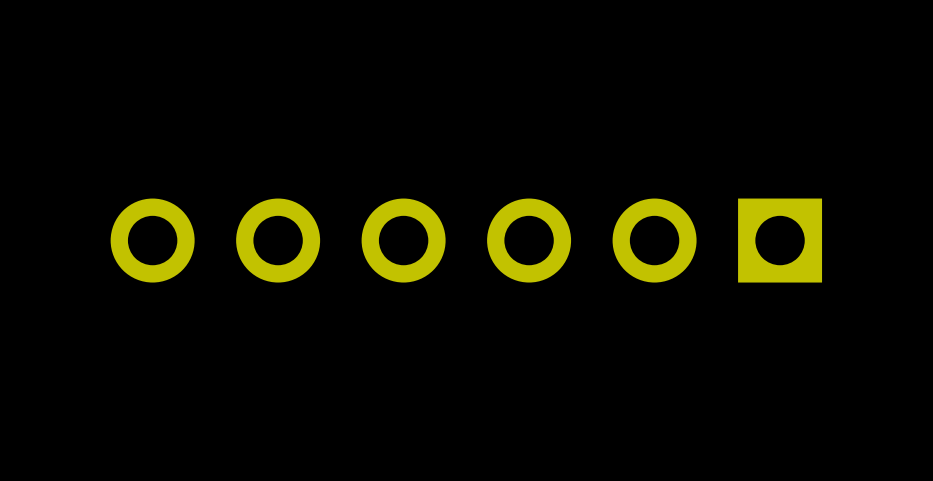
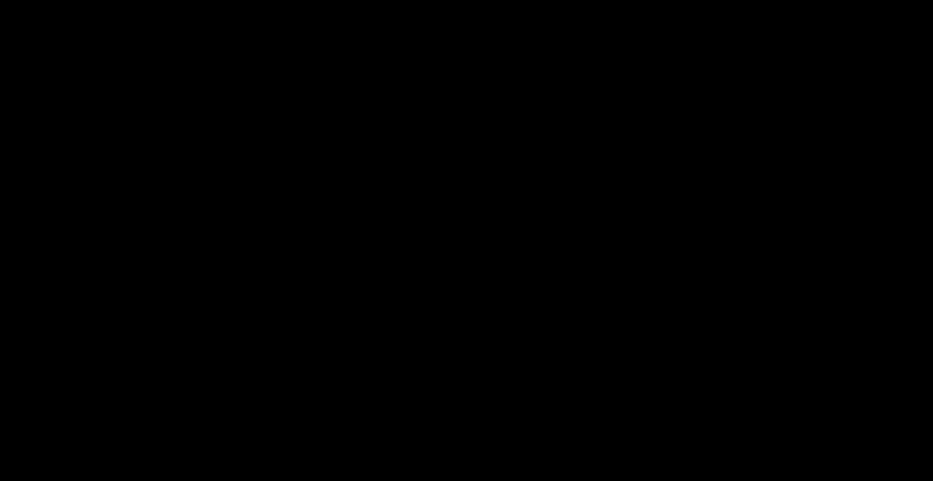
part: (466, 240) -> none

